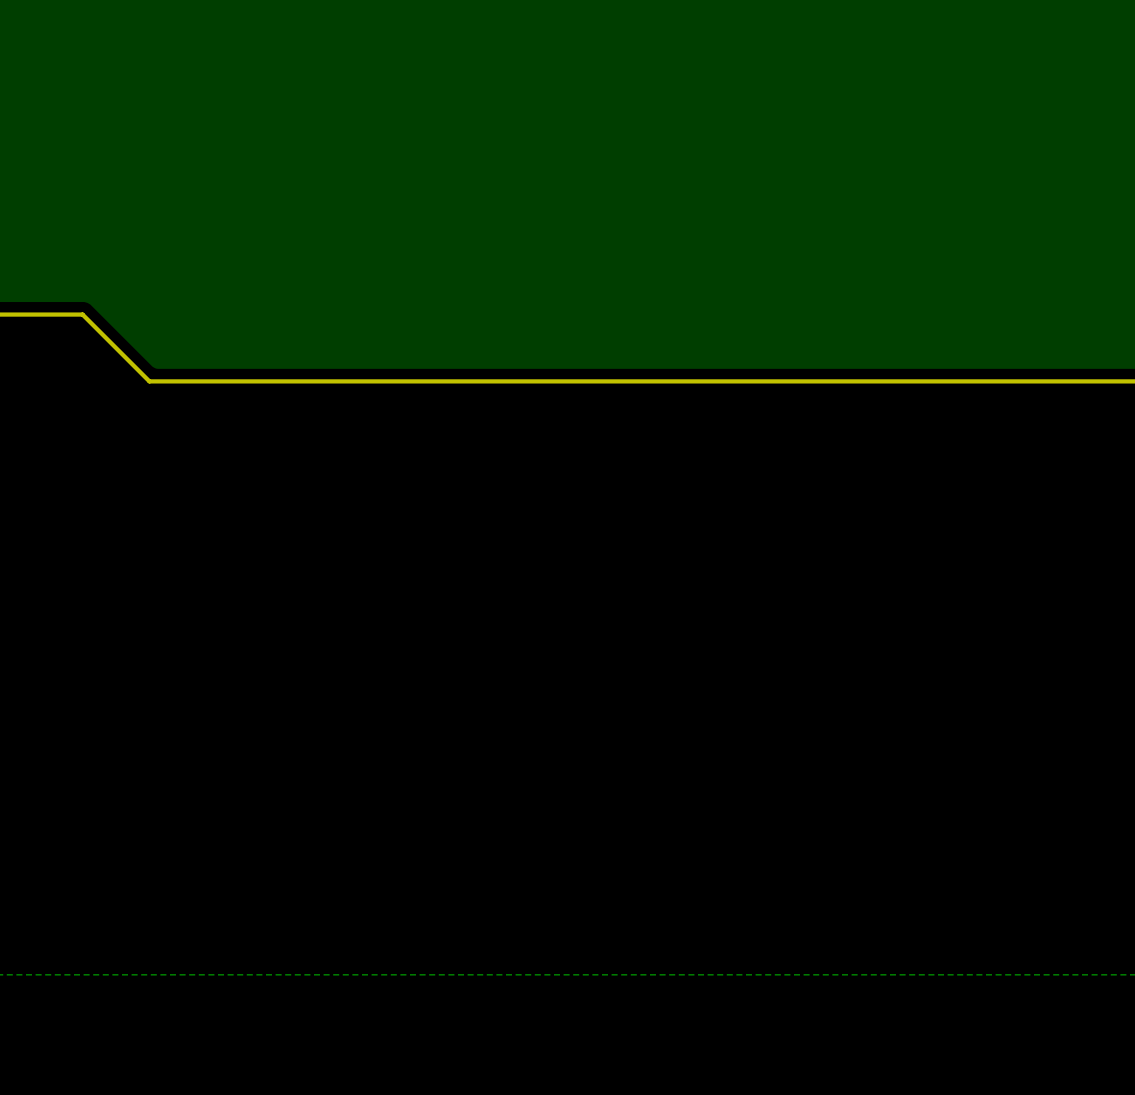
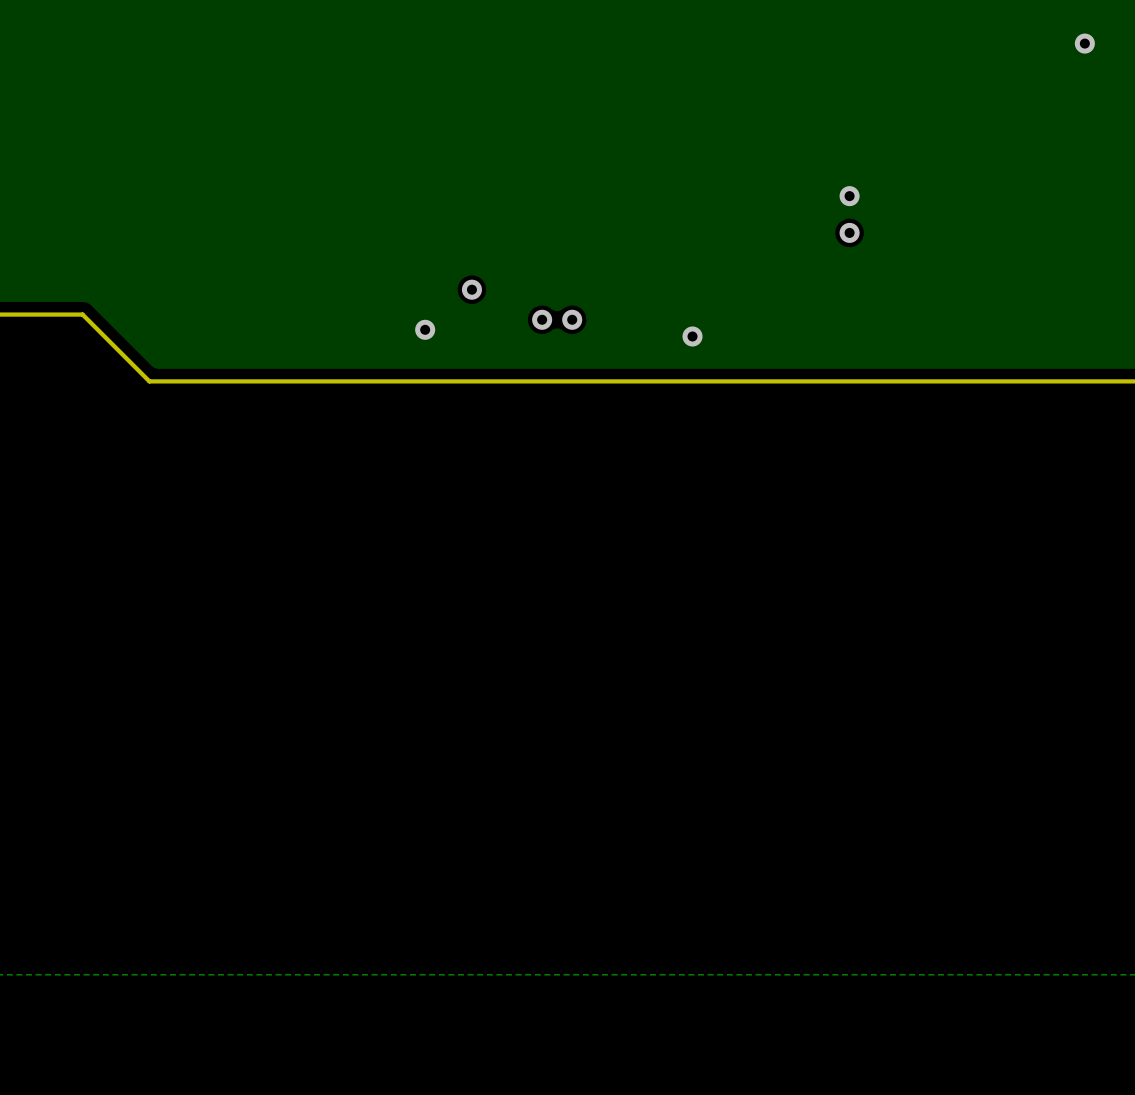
via: none -> (1084, 43)
via: none -> (849, 196)
via: none -> (849, 232)
via: none -> (471, 289)
via: none -> (542, 319)
via: none -> (572, 319)
via: none -> (425, 329)
via: none -> (692, 336)

